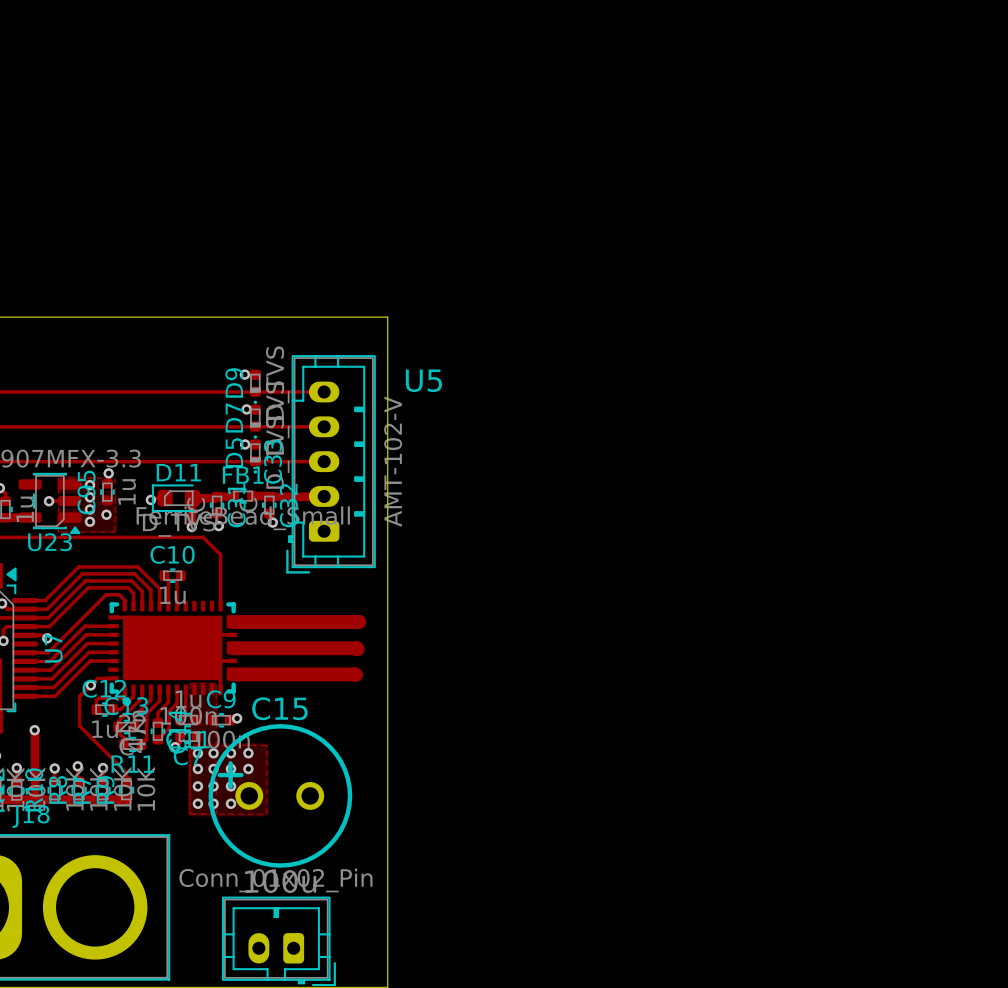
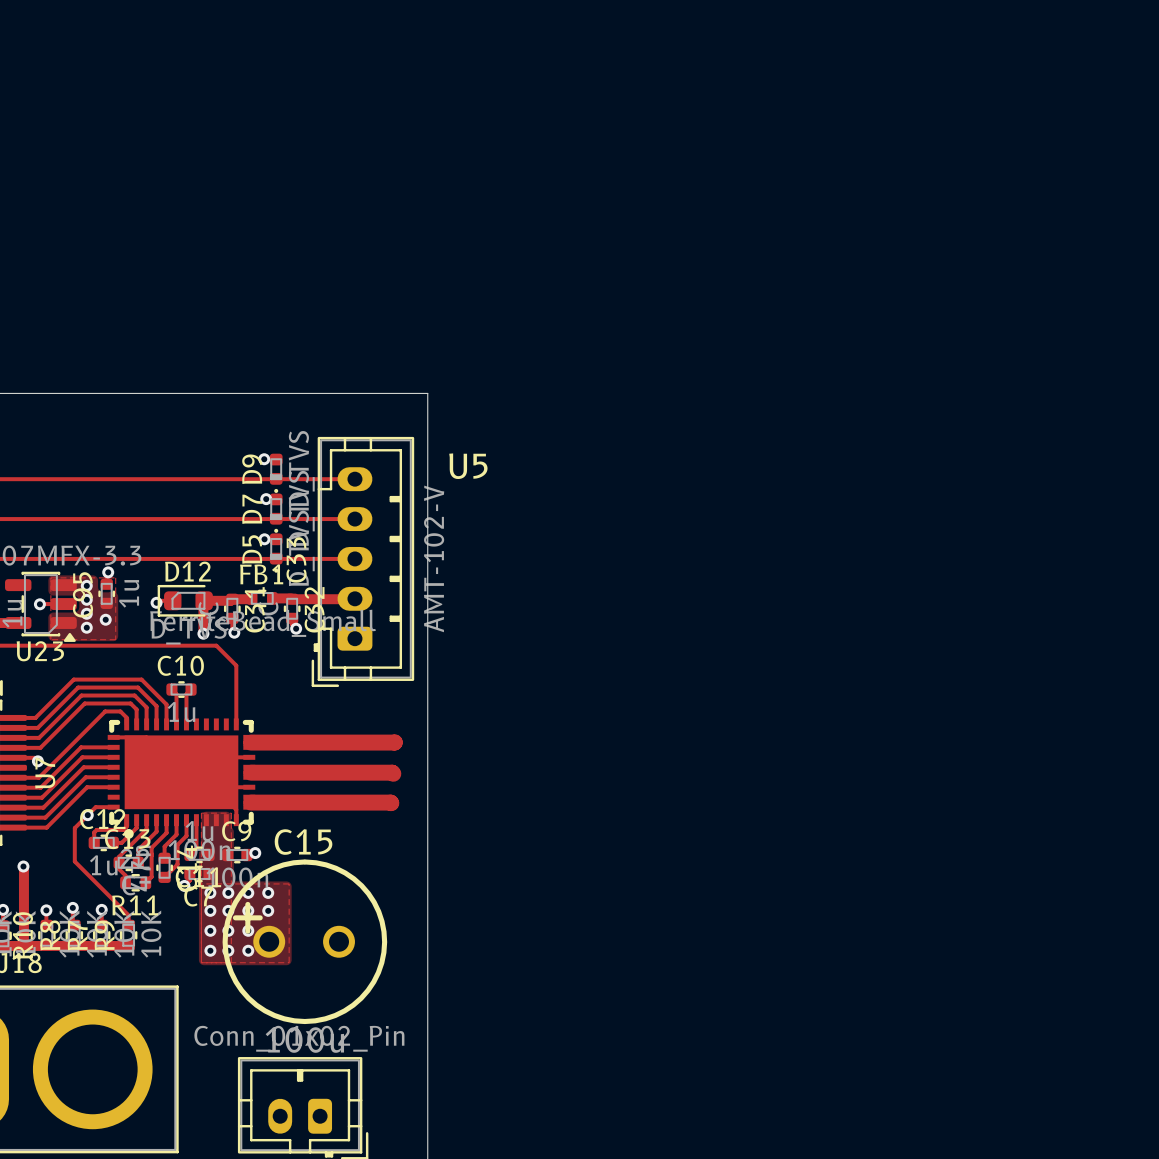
D11 name: D11 (178, 472) -> D12 (187, 571)

